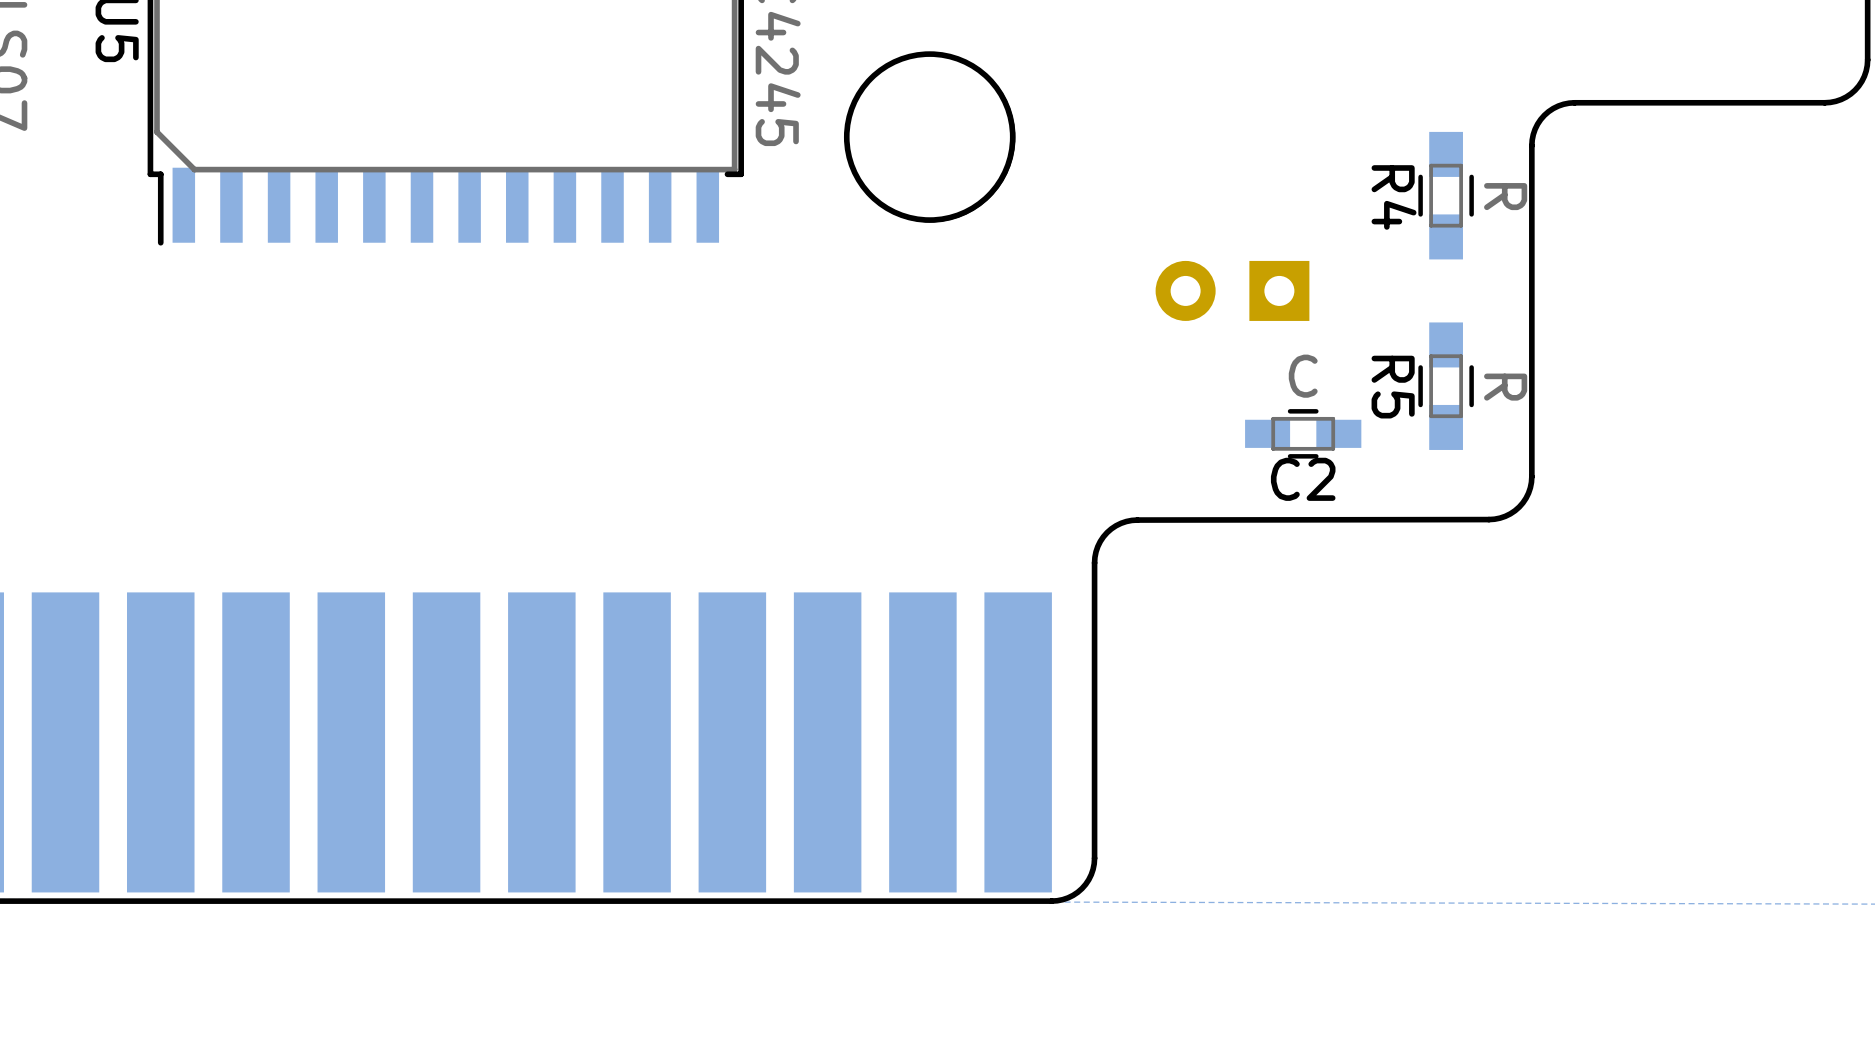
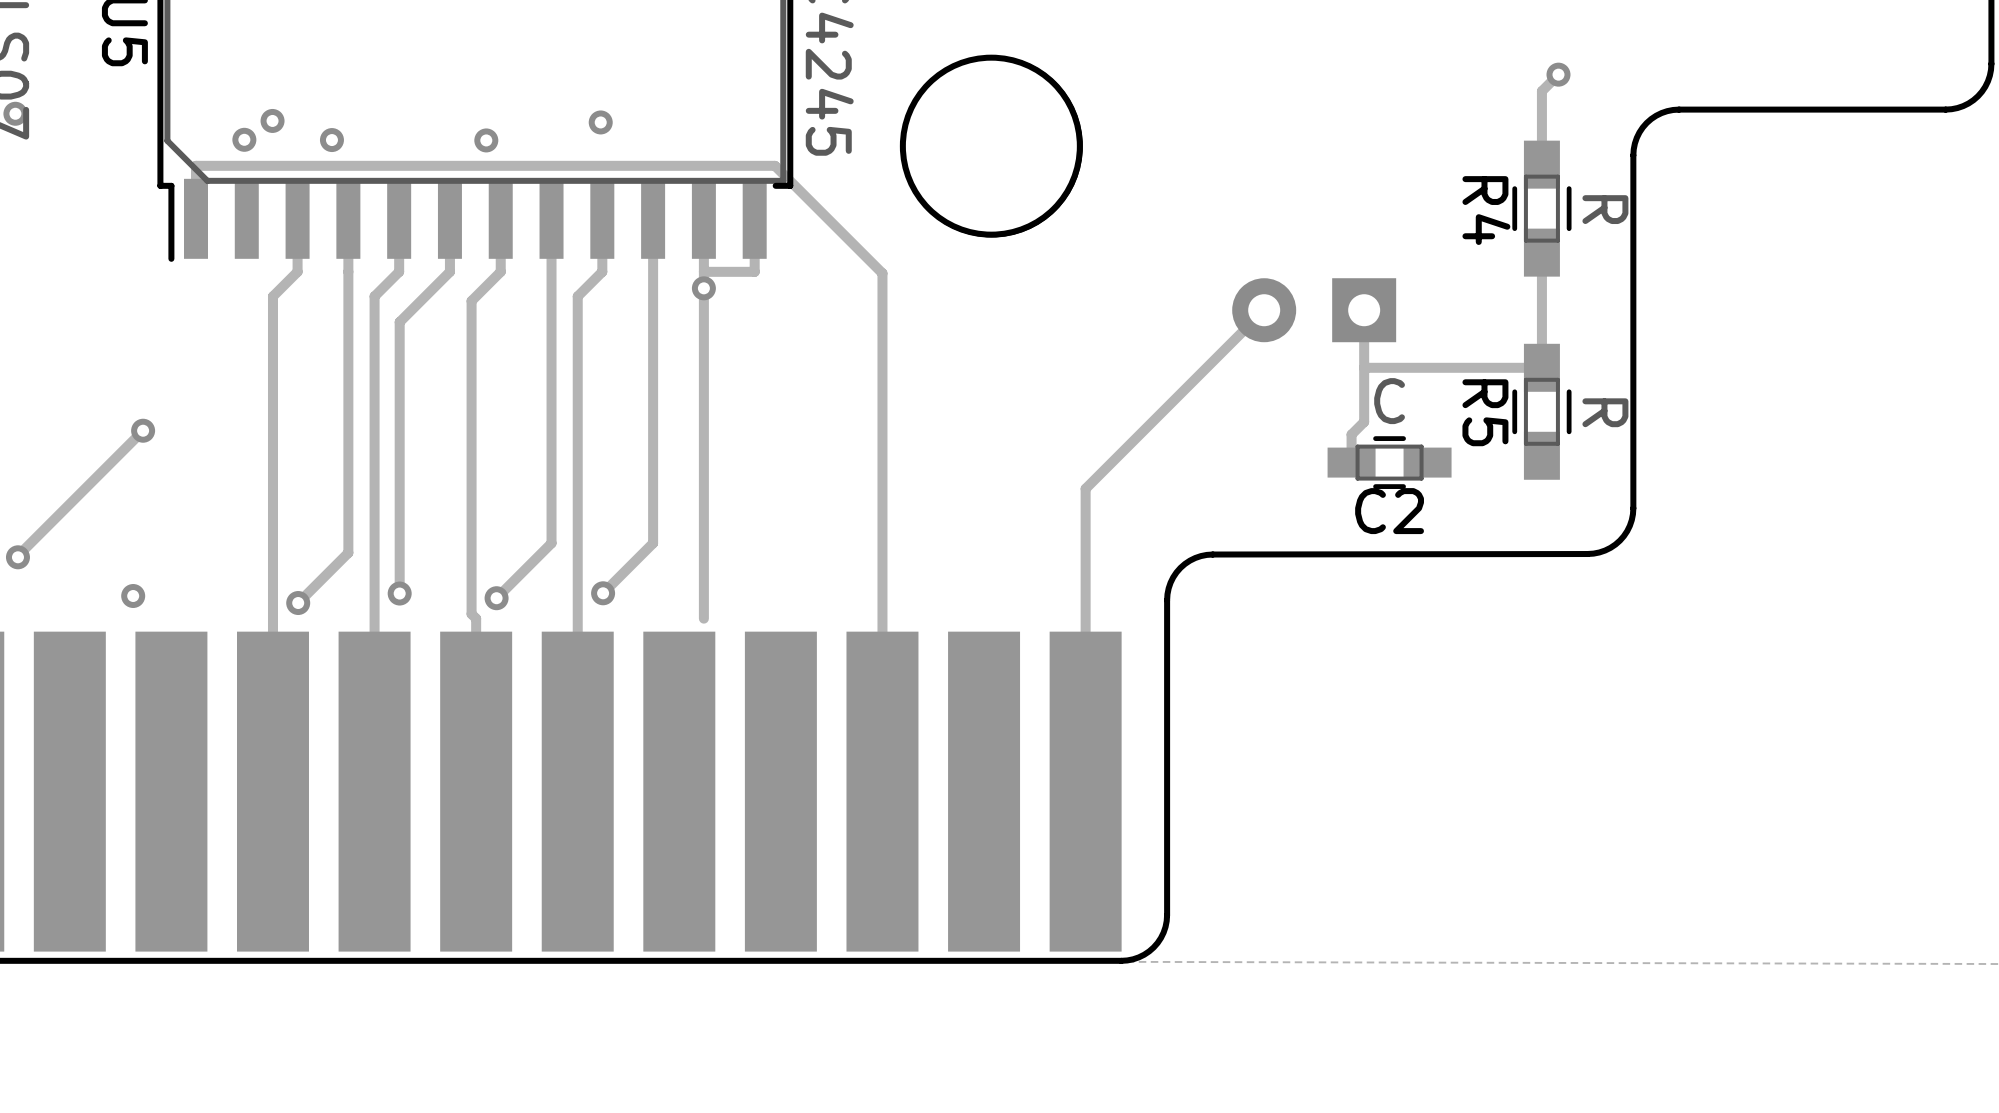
track: none -> (1558, 74) (1541, 91) (1541, 164)
via: none -> (1558, 74)
via: none -> (15, 113)
via: none -> (272, 120)
via: none -> (600, 122)
via: none -> (244, 139)
via: none -> (331, 140)
via: none -> (486, 140)
track: none -> (196, 218) (196, 165) (774, 165) (882, 273) (882, 791)
track: none -> (297, 218) (297, 271) (272, 296) (272, 791)
track: none -> (348, 218) (348, 552) (298, 603)
track: none -> (399, 218) (399, 271) (374, 296) (374, 791)
track: none -> (449, 218) (449, 271) (399, 322) (399, 593)
track: none -> (500, 218) (500, 271) (471, 301) (471, 614) (476, 618) (476, 791)
track: none -> (551, 218) (551, 543) (496, 598)
track: none -> (602, 218) (602, 271) (577, 296) (577, 791)
track: none -> (653, 218) (653, 543) (603, 593)
track: none -> (703, 218) (703, 618)
track: none -> (754, 218) (754, 271) (703, 271)
track: none -> (1541, 252) (1541, 367) (1364, 367)
via: none -> (703, 288)
track: none -> (1264, 310) (1085, 488) (1085, 791)
track: none -> (1364, 310) (1364, 421) (1351, 434) (1351, 462)
track: none -> (143, 430) (17, 557)
via: none -> (143, 430)
via: none -> (17, 557)
via: none -> (399, 593)
via: none -> (603, 593)
via: none -> (133, 596)
via: none -> (496, 598)
via: none -> (298, 603)

